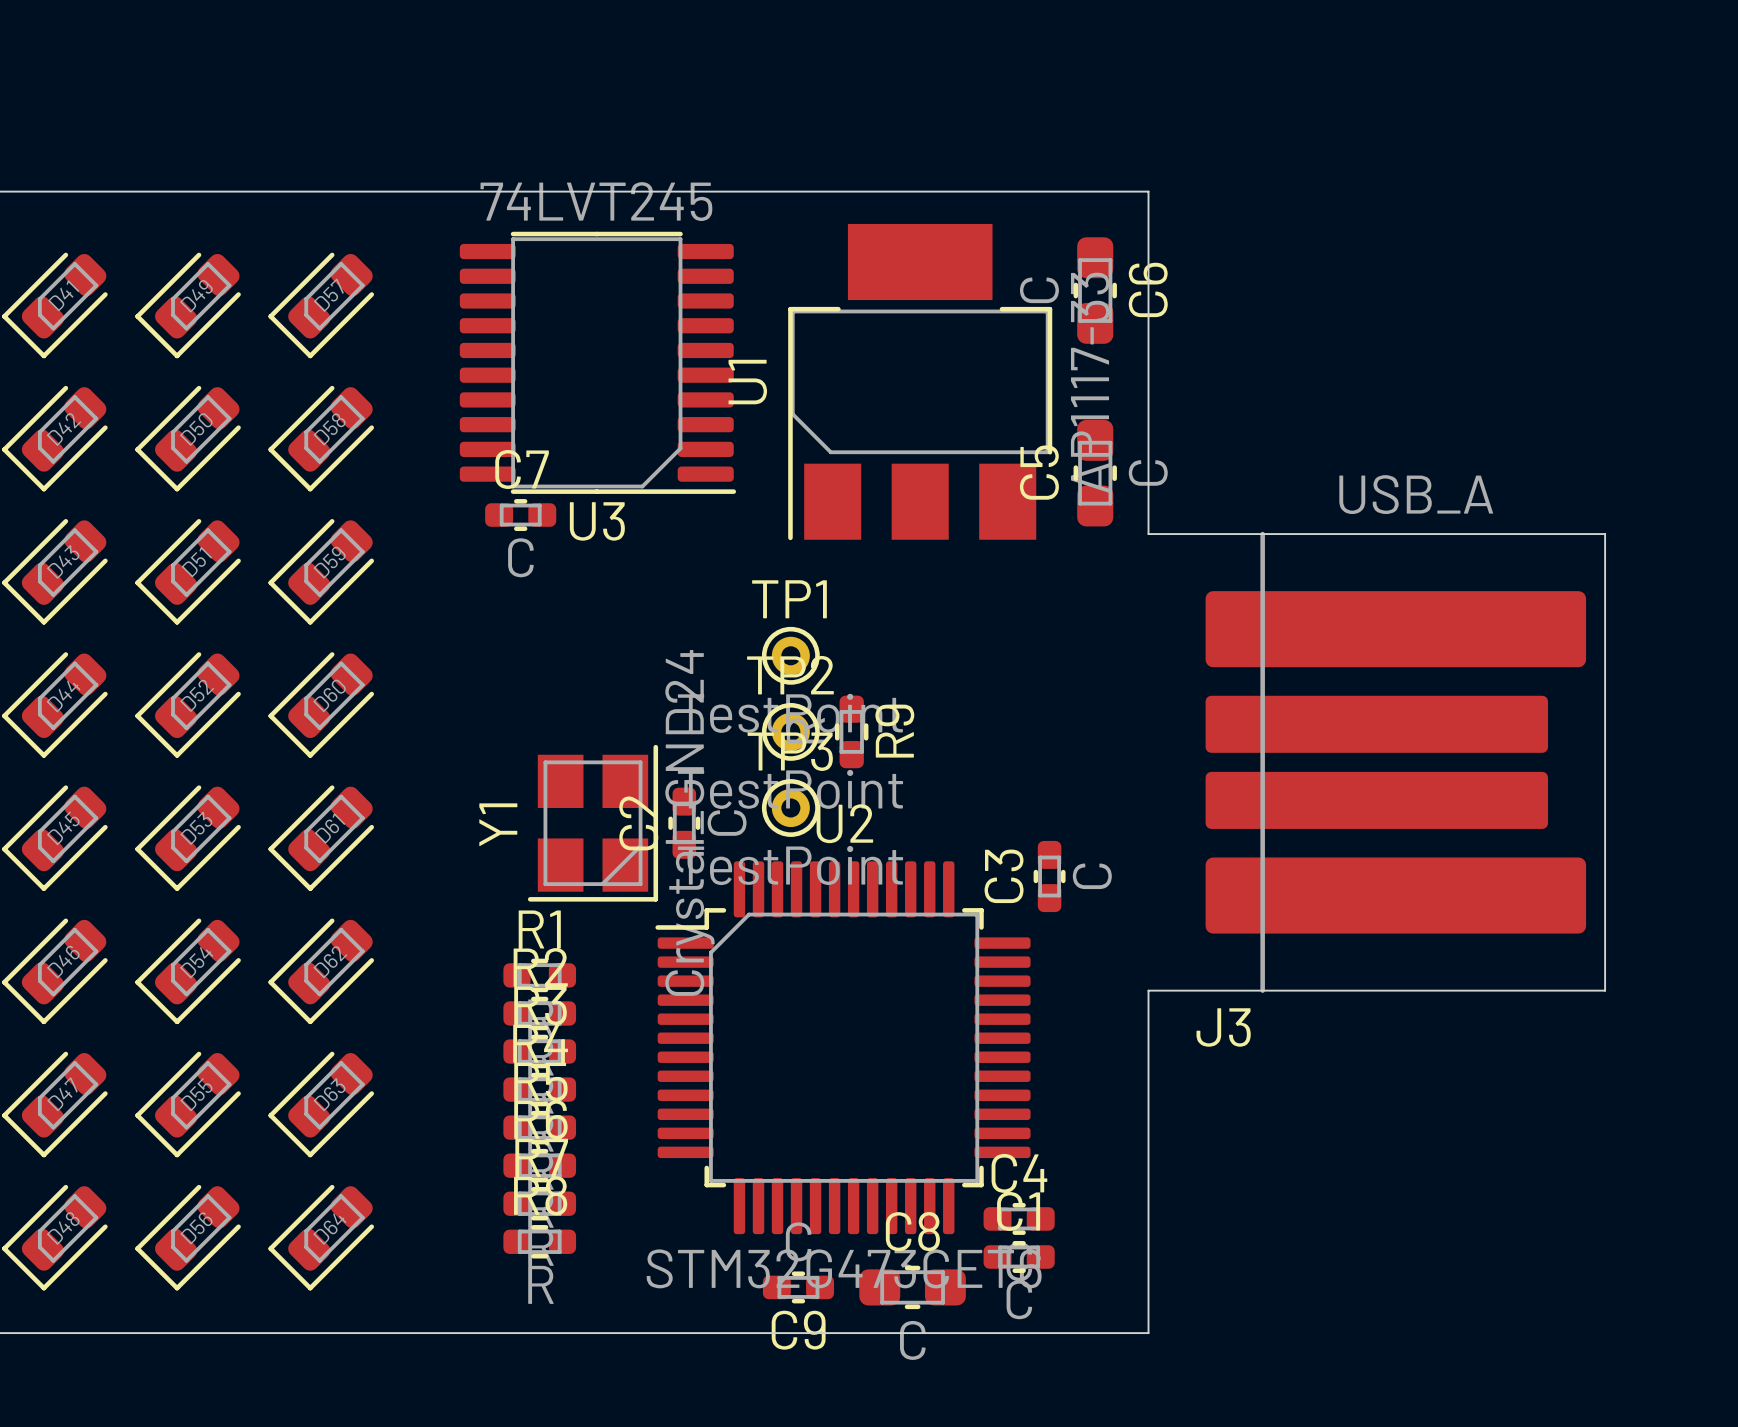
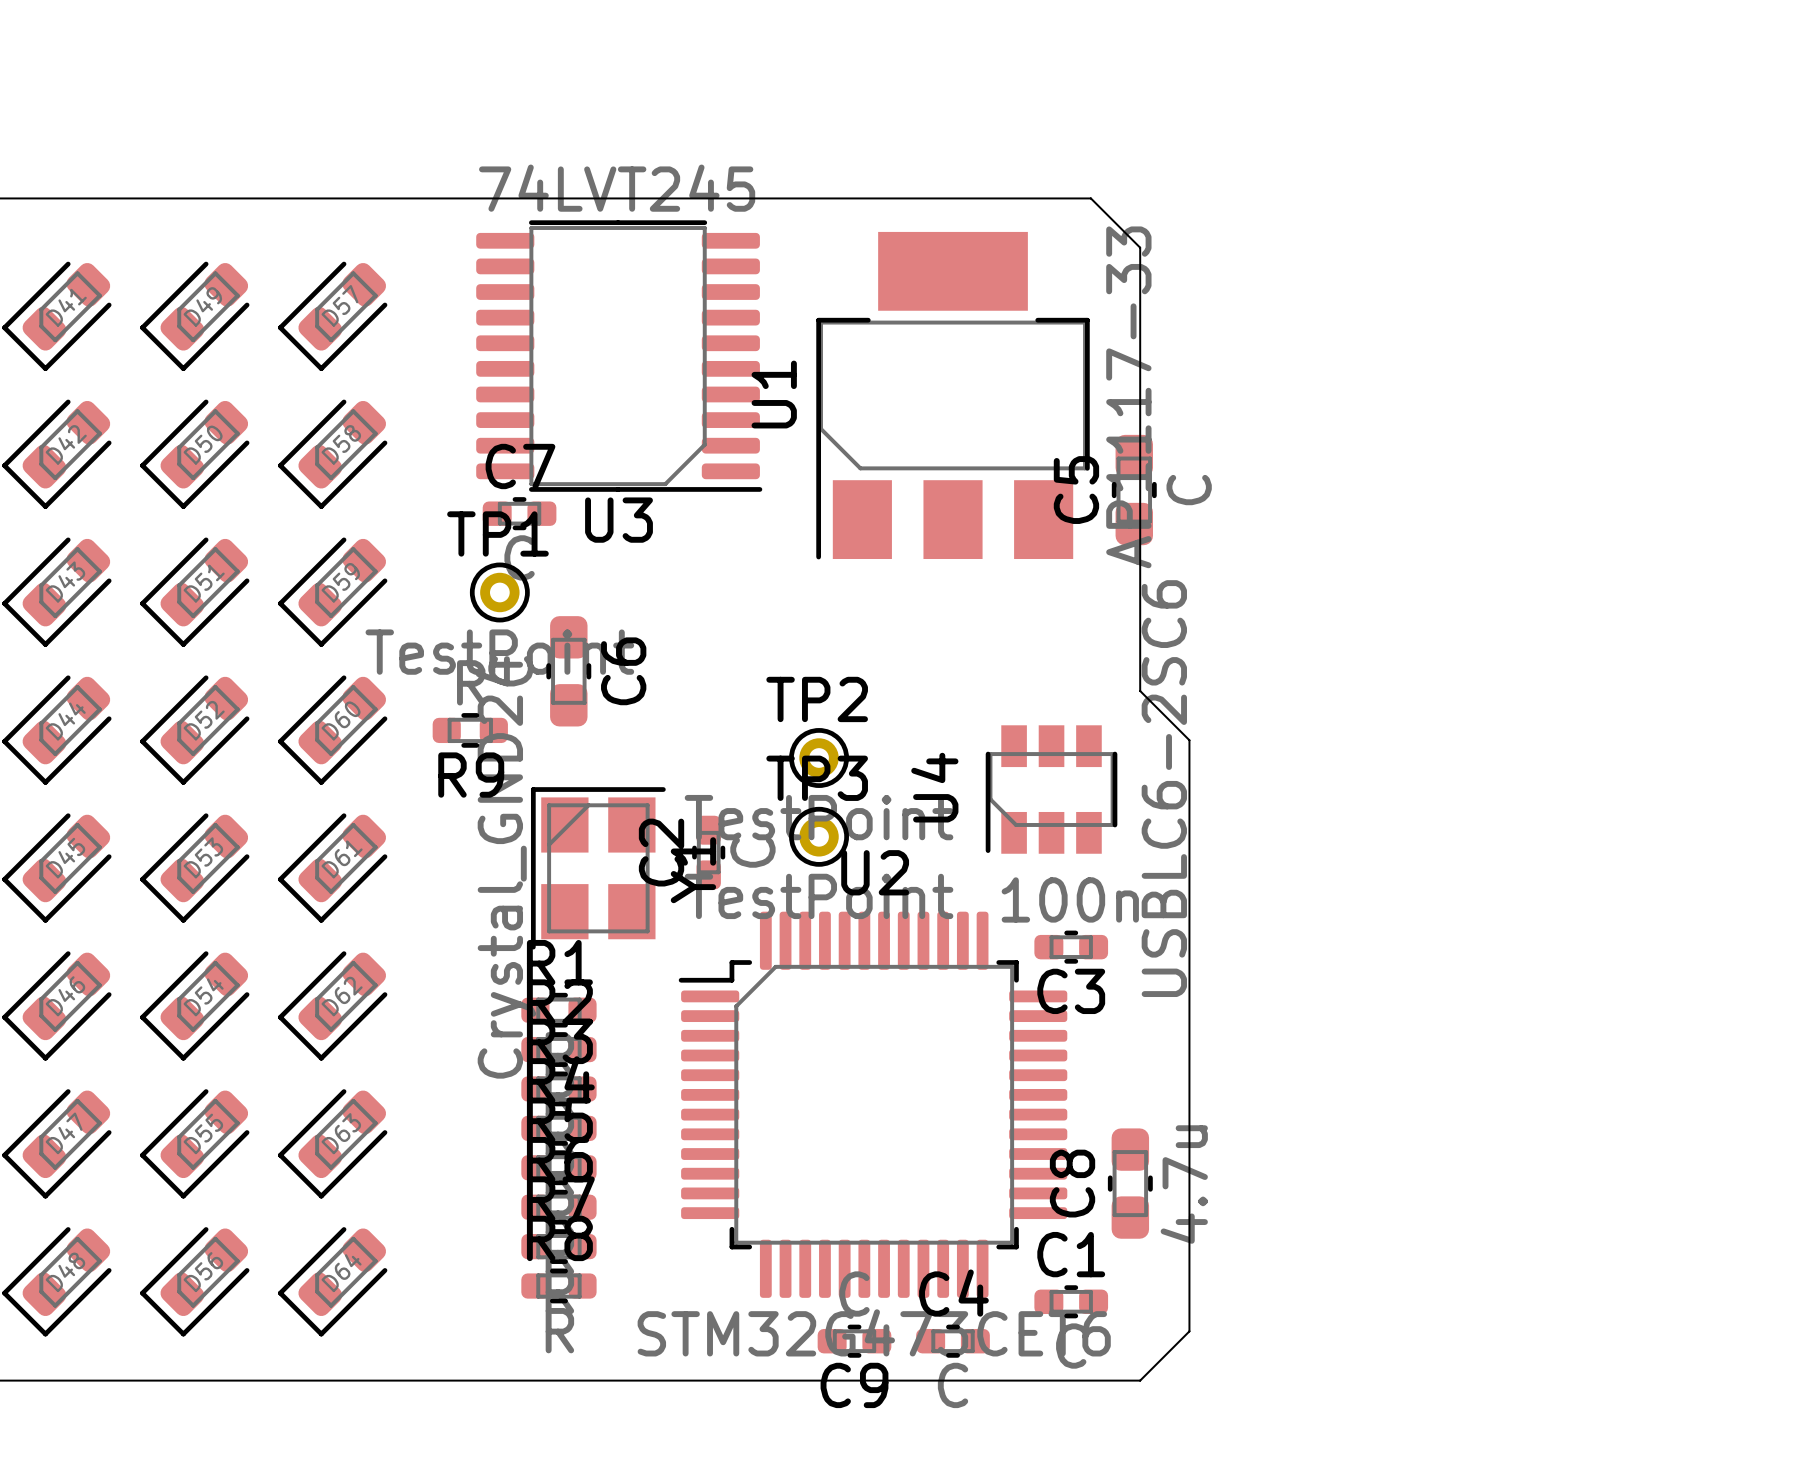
board edge: (1053, 191) (1148, 191) (1148, 534) (1605, 534) (1605, 990) (1148, 990) -> (1090, 198) (1140, 247) (1140, 691) (1189, 740) (1189, 1025)
C6 position: (1095, 290) -> (568, 671)
U3 position: (597, 362) -> (619, 356)
C7 position: (520, 515) -> (519, 513)
TP1 position: (790, 655) -> (499, 592)
R9 rotation: 0° (851, 731) -> 90° clockwise (470, 730)
R9 position: (851, 731) -> (470, 730)
U4: none -> USBLC6-2SC6 (1051, 789)
J3: USB_A (1395, 762) -> none
Y1 rotation: 0° (592, 823) -> 180° (598, 868)
C3 rotation: 0° (1049, 876) -> 90° clockwise (1071, 947)
C3 value: C (1092, 876) -> 100n (1070, 899)
U2 position: (842, 1047) -> (873, 1104)
C4 position: (1019, 1218) -> (953, 1341)
C8 name position: C8 (912, 1231) -> C8 (1072, 1183)
C1 position: (1019, 1256) -> (1071, 1301)
board edge: (1148, 1285) (1148, 1333) (1100, 1333) -> (1189, 1331) (1140, 1380)
C9 position: (798, 1287) -> (854, 1341)
C8 rotation: 0° (912, 1287) -> 90° clockwise (1130, 1183)
C8 position: (912, 1287) -> (1130, 1183)
C8 value: C (912, 1340) -> 4.7u (1184, 1184)

